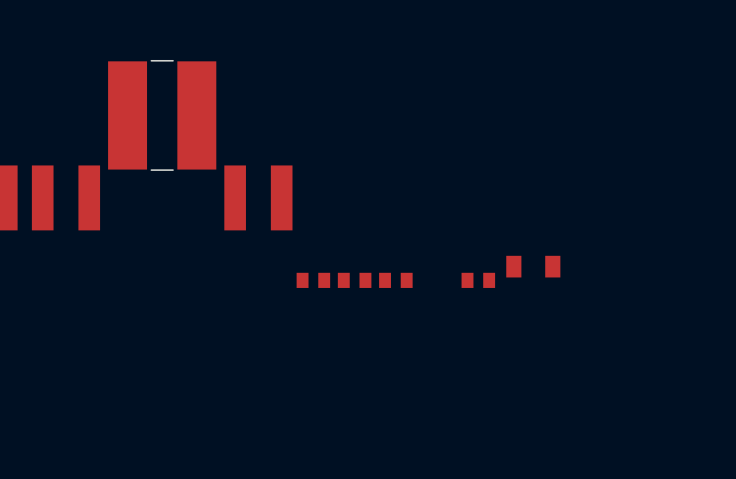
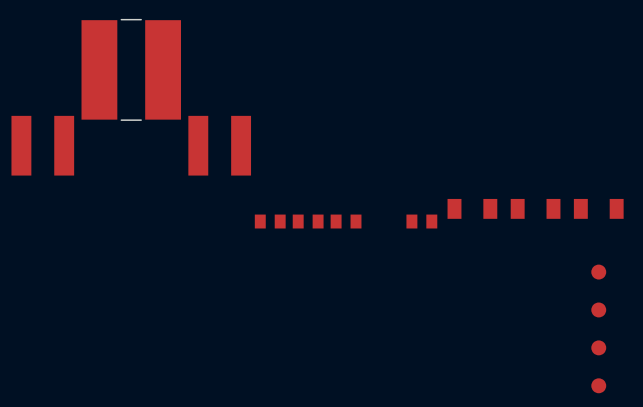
part: none -> (535, 208)
part: none -> (598, 208)
part: none -> (598, 272)
part: none -> (598, 309)
part: none -> (598, 347)
part: none -> (598, 385)

